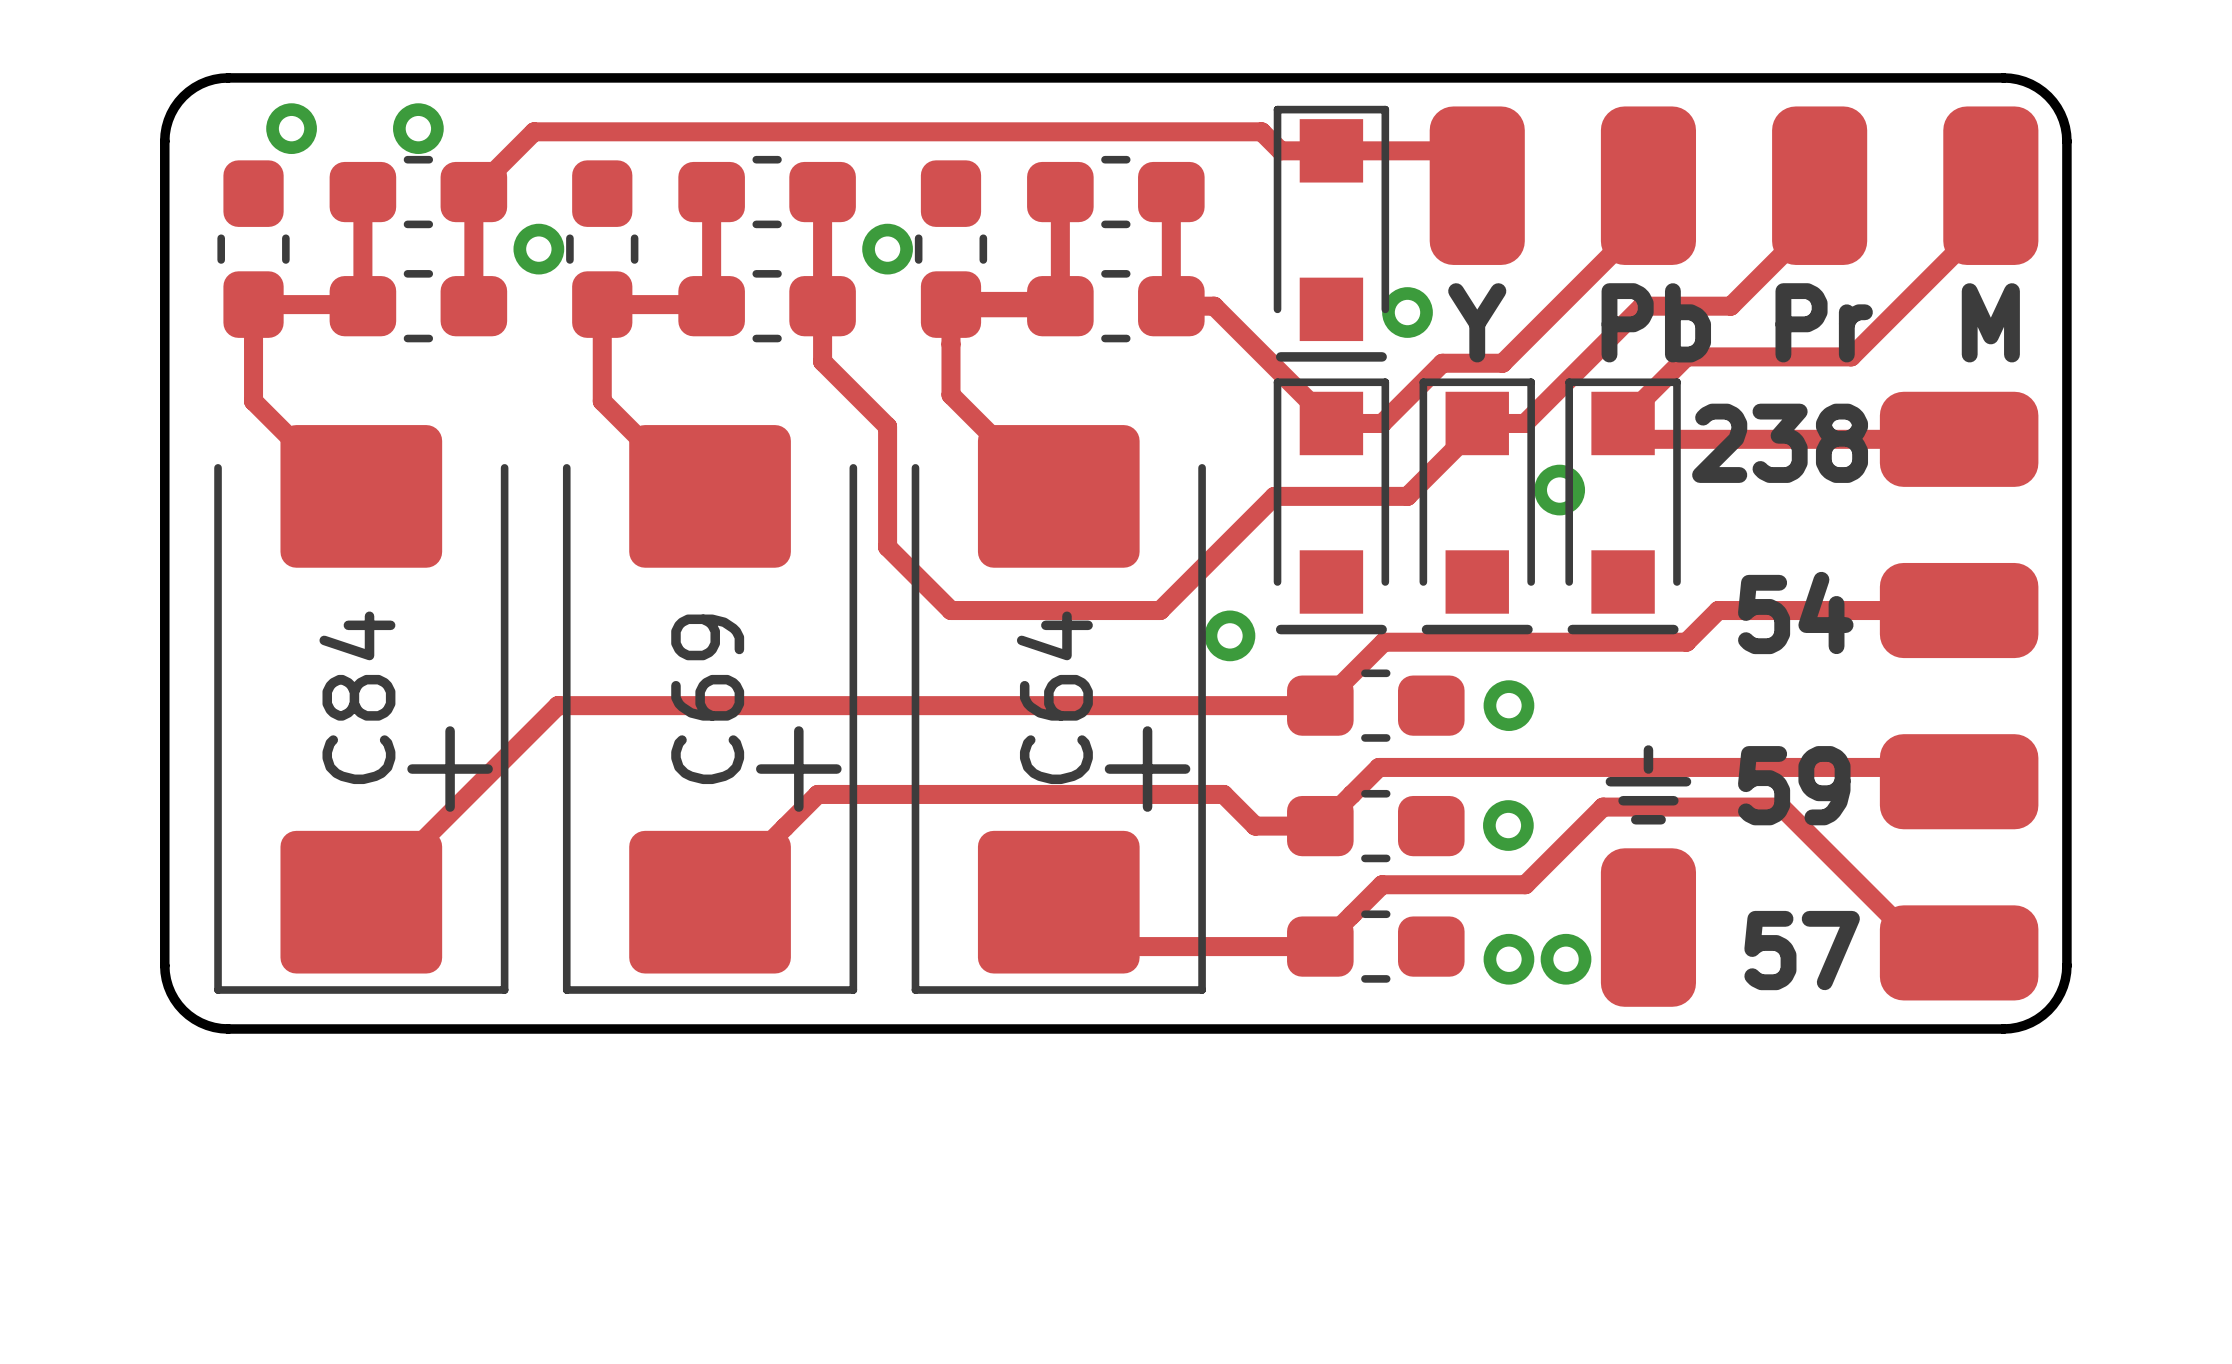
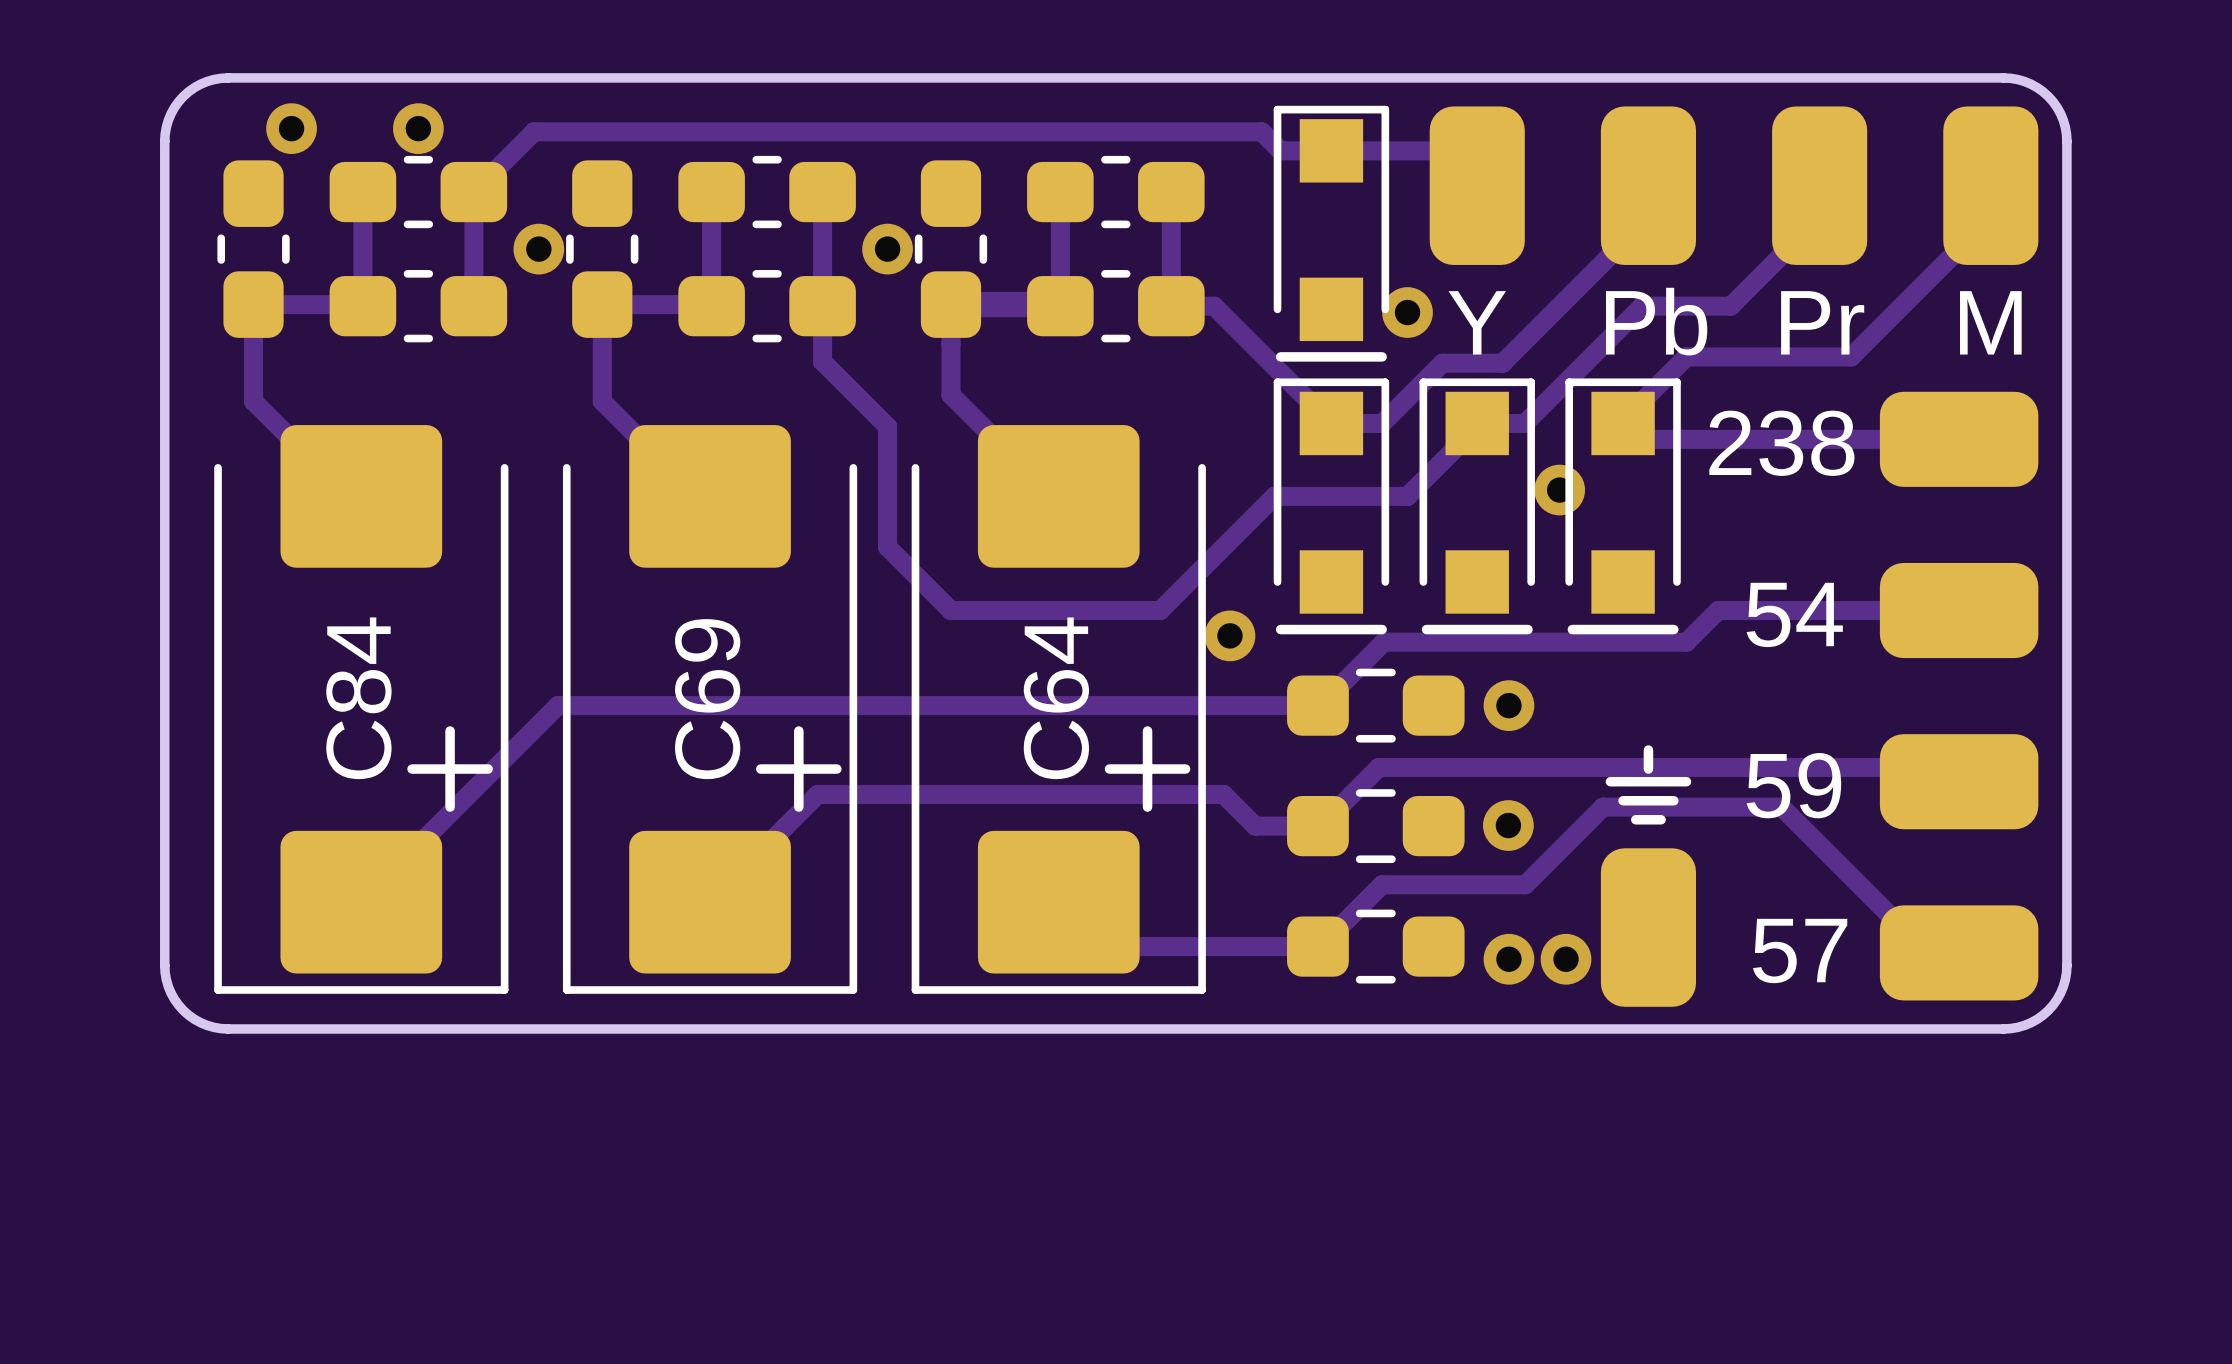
part footprint: [1287, 669, 1465, 742] -> [1287, 668, 1465, 743]
part footprint: [1287, 789, 1465, 863] -> [1287, 789, 1465, 864]
part footprint: [1287, 910, 1465, 983] -> [1287, 909, 1465, 984]

